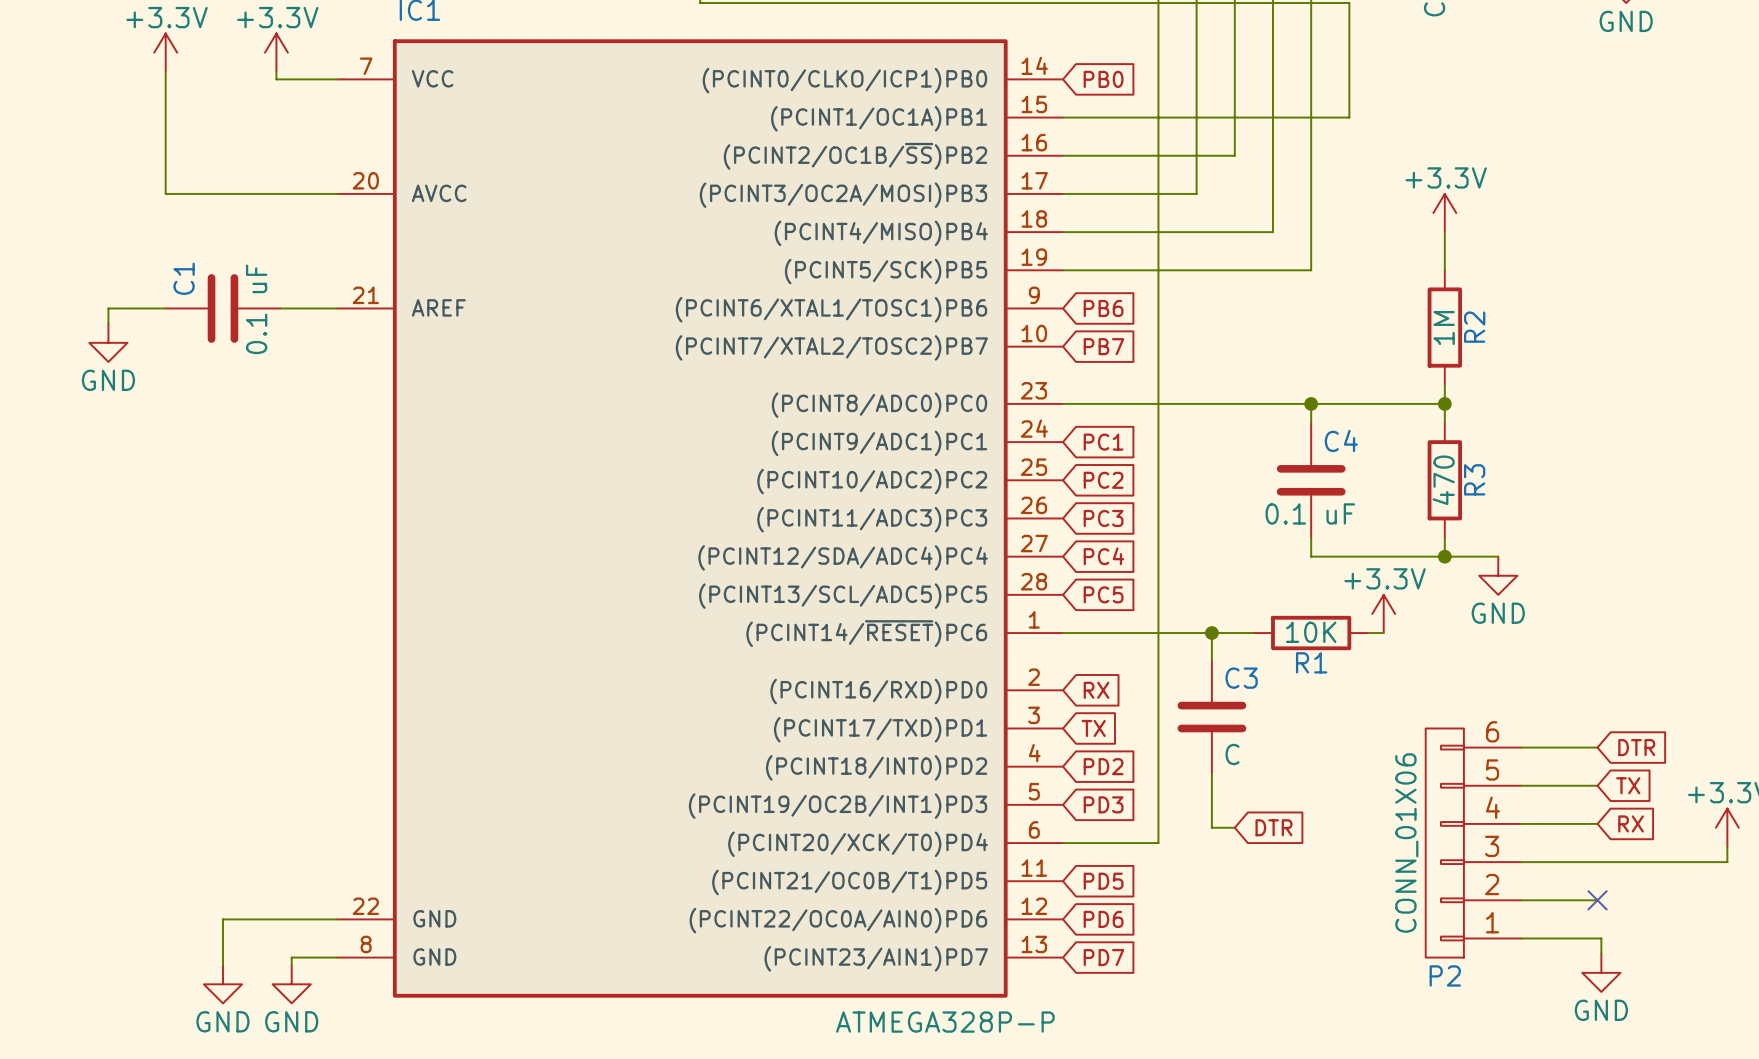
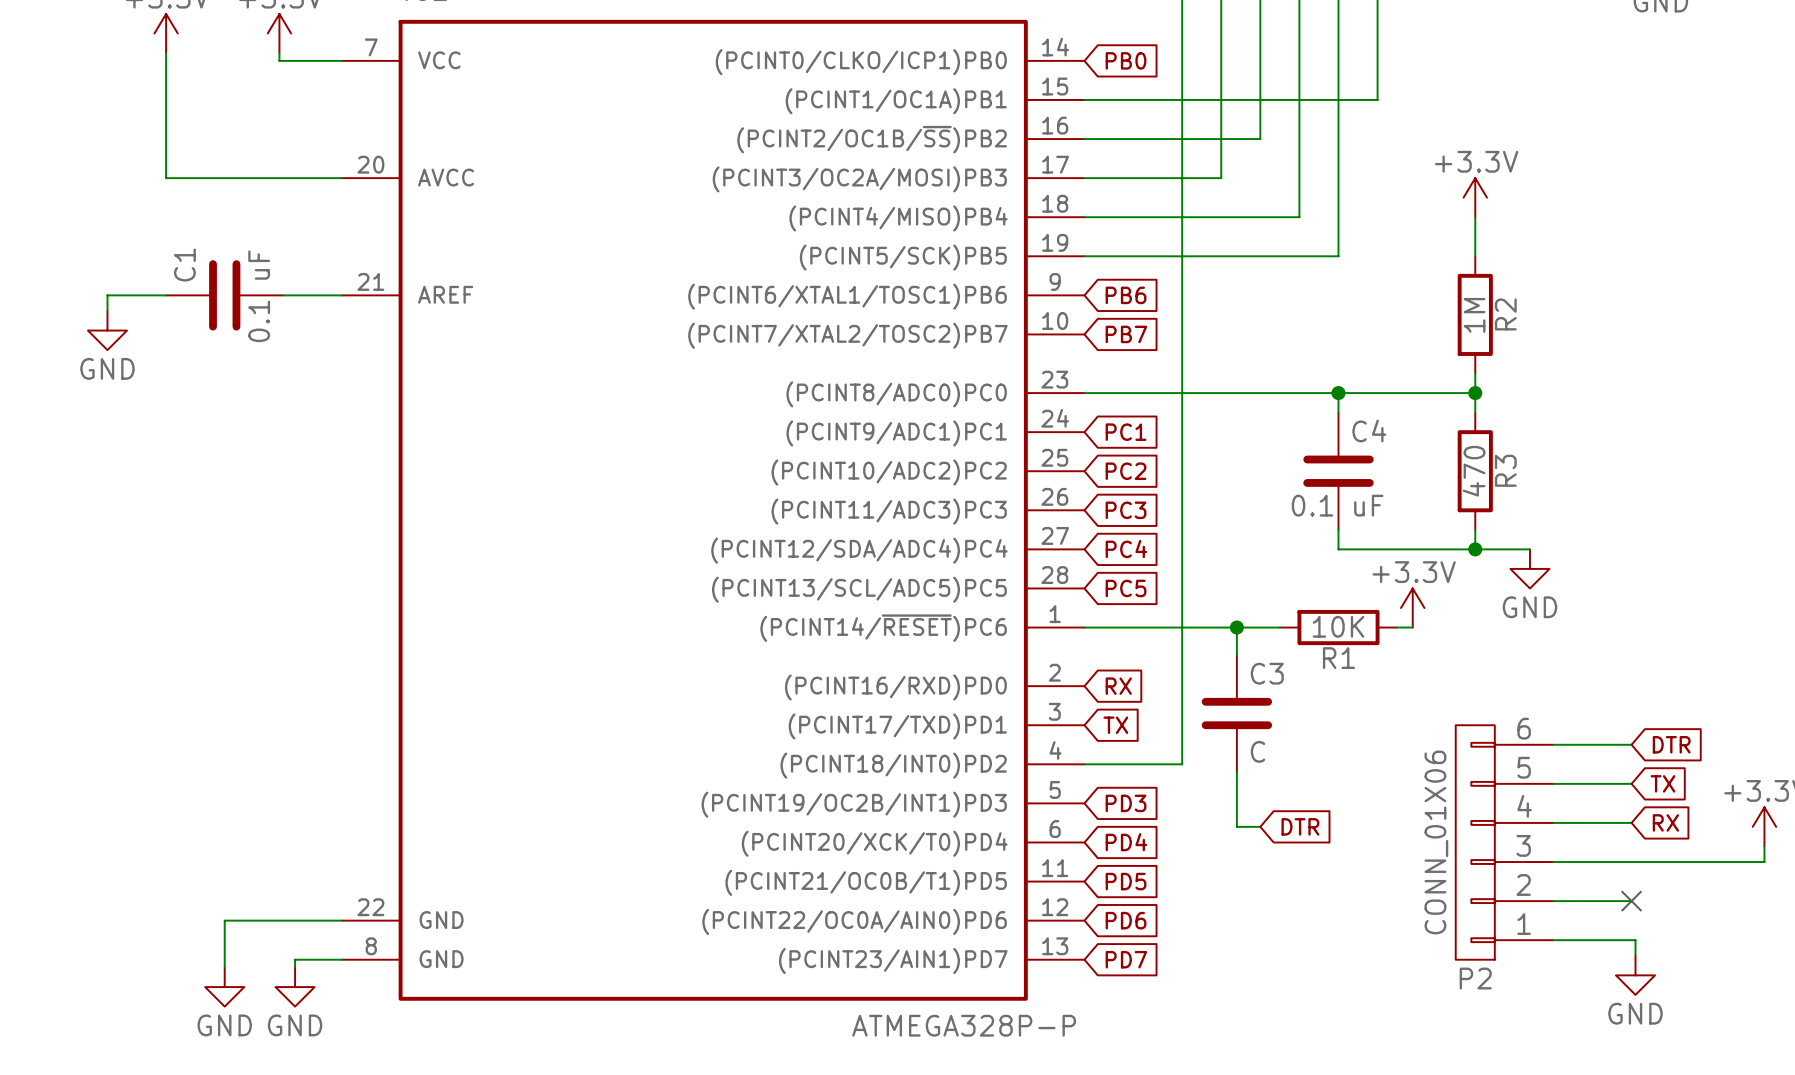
global label: PD2 (1103, 766) -> none
wire: (1158, 766) (1158, 843) (1062, 843) -> (1182, 764) (1084, 764)
global label: none -> PD4 (1126, 842)

